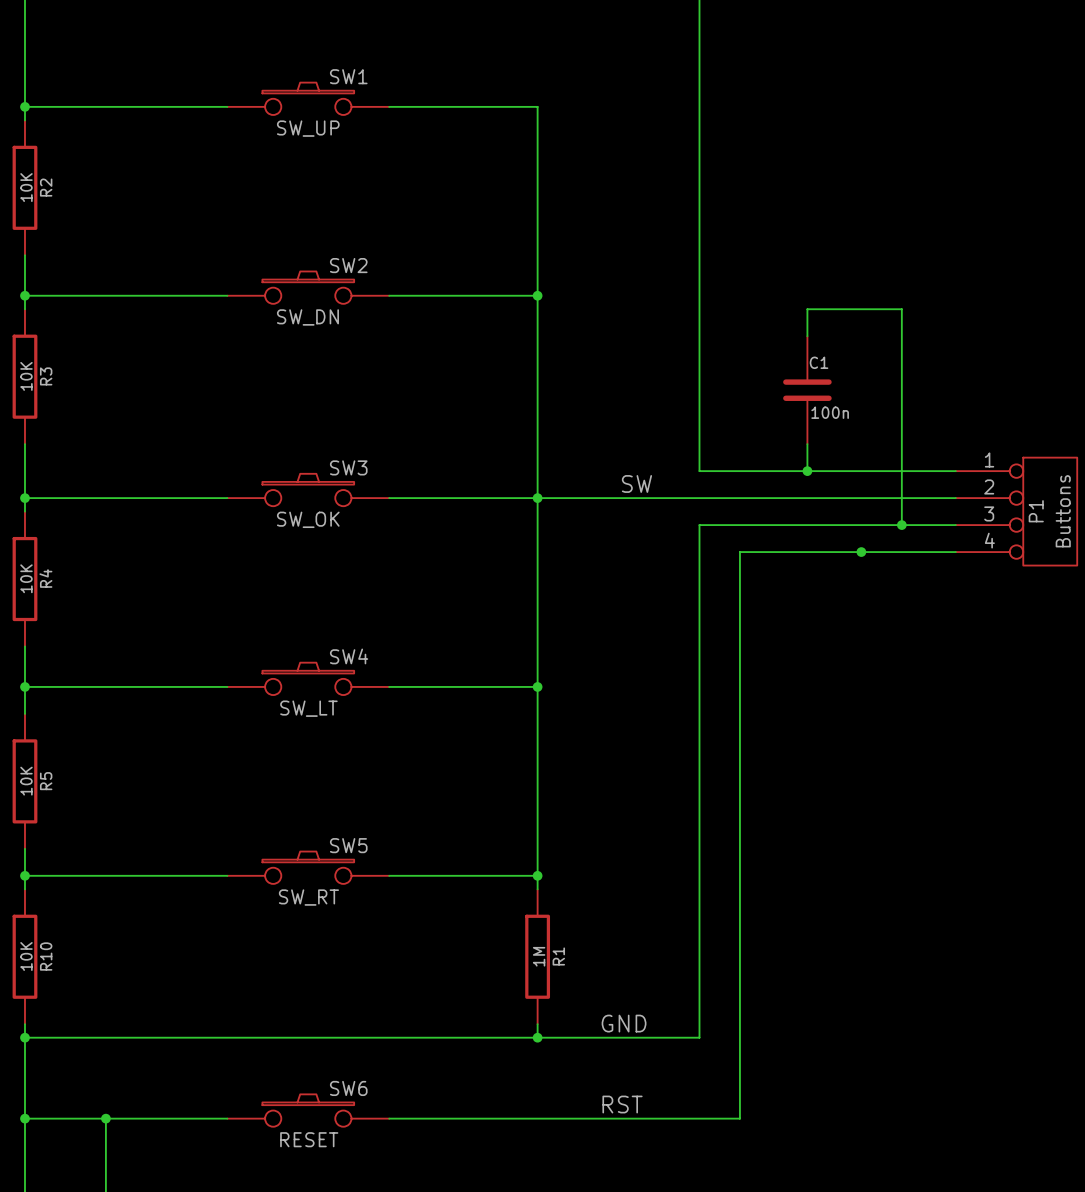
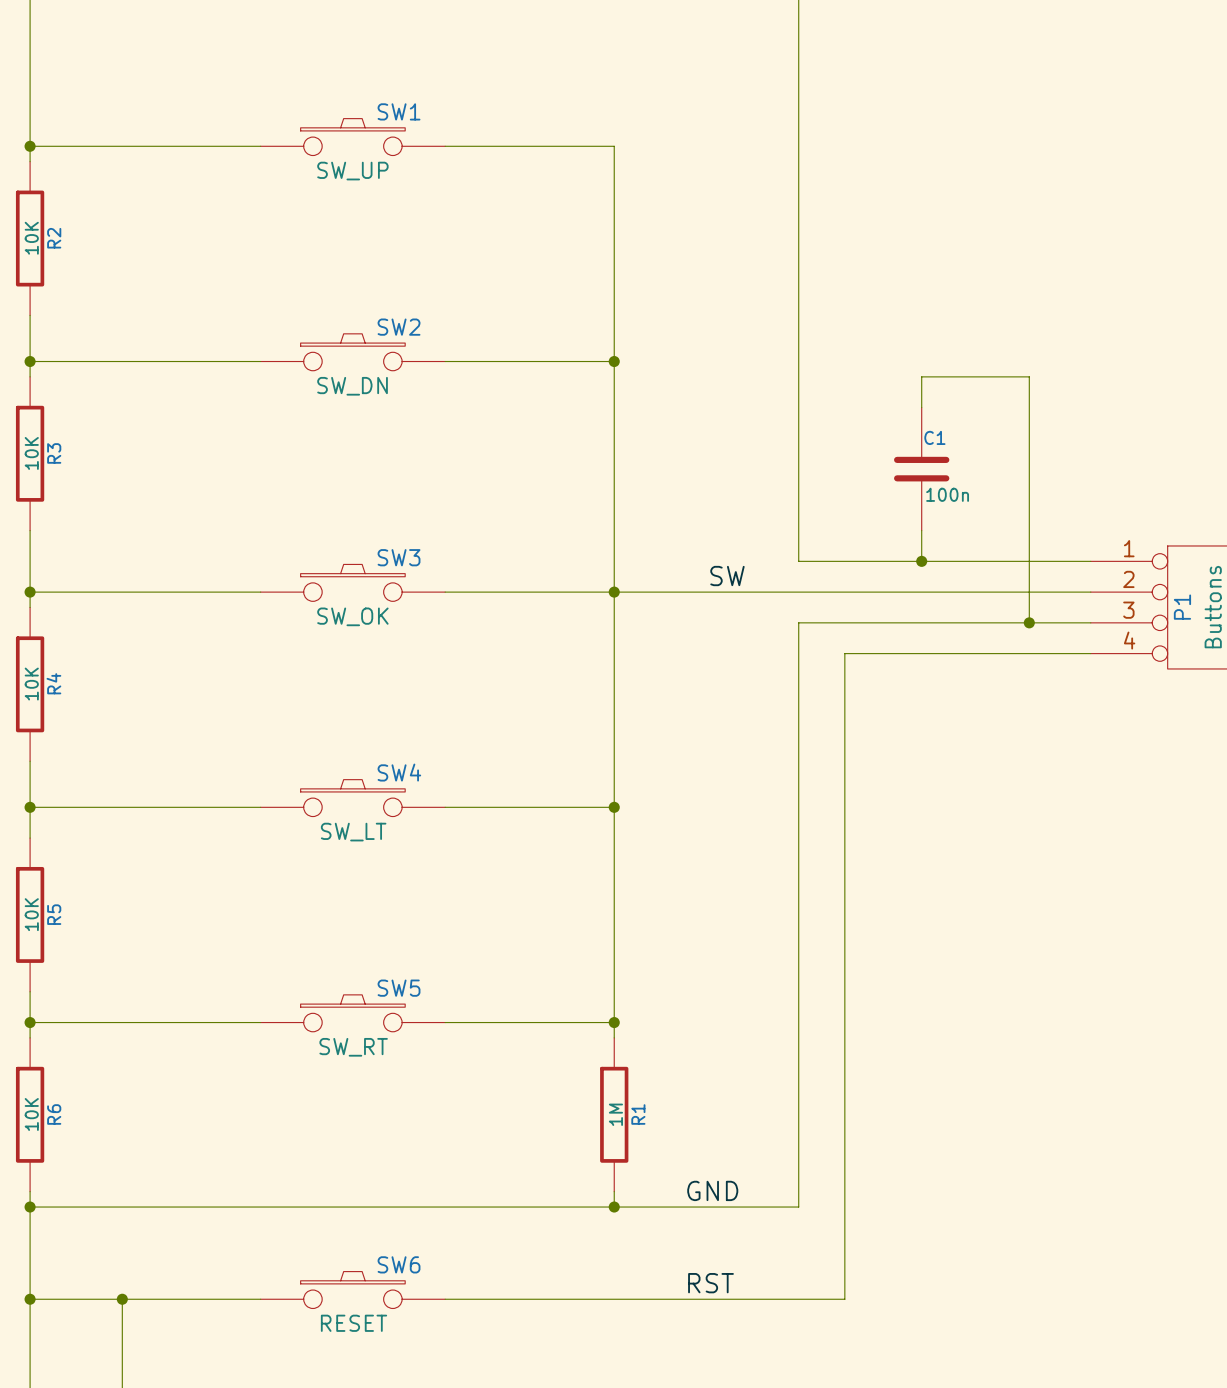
junction: (861, 552) -> none
R10 name: R10 (46, 956) -> R6 (54, 1114)

